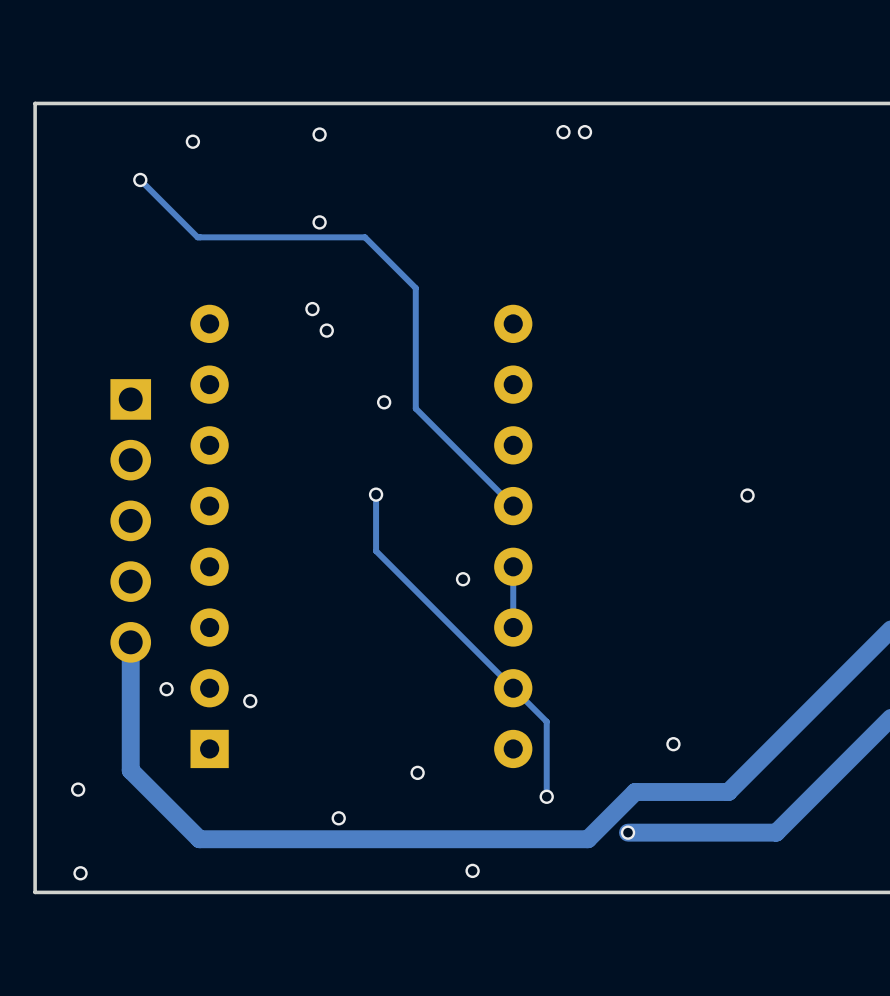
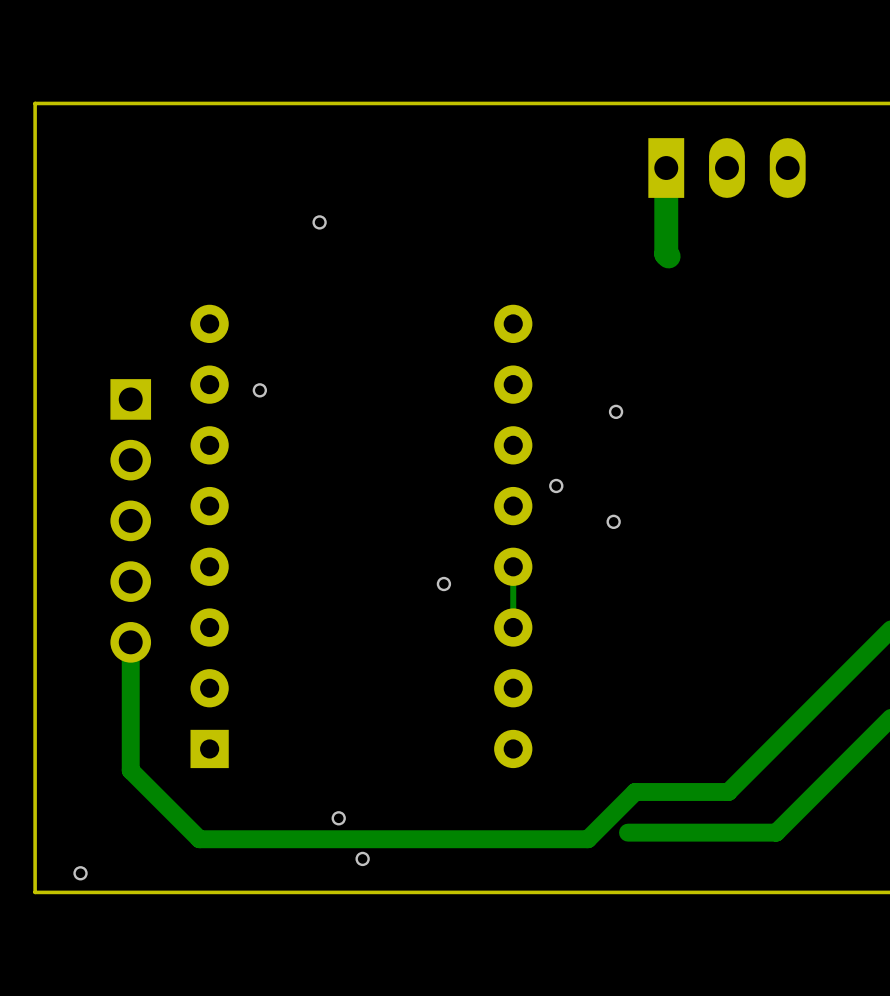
via: (563, 132) -> none
via: (584, 132) -> none
via: (319, 134) -> none
via: (192, 141) -> none
track: none -> (666, 168) (666, 254) (668, 256)
part: none -> (726, 168)
track: (140, 179) (197, 237) (364, 237) (415, 288) (415, 408) (513, 506) -> none
via: (140, 179) -> none
via: (312, 309) -> none
via: (326, 330) -> none
via: none -> (259, 390)
via: (384, 402) -> none
via: none -> (616, 411)
via: none -> (556, 485)
track: (376, 494) (376, 551) (546, 721) (546, 796) -> none
via: (376, 494) -> none
via: (747, 495) -> none
via: none -> (613, 521)
via position: (463, 579) -> (443, 584)
via: (166, 689) -> none
via: (250, 701) -> none
via: (673, 744) -> none
via: (417, 772) -> none
via: (78, 789) -> none
via: (546, 796) -> none
via: (628, 832) -> none
via: none -> (362, 858)
via: (472, 870) -> none

